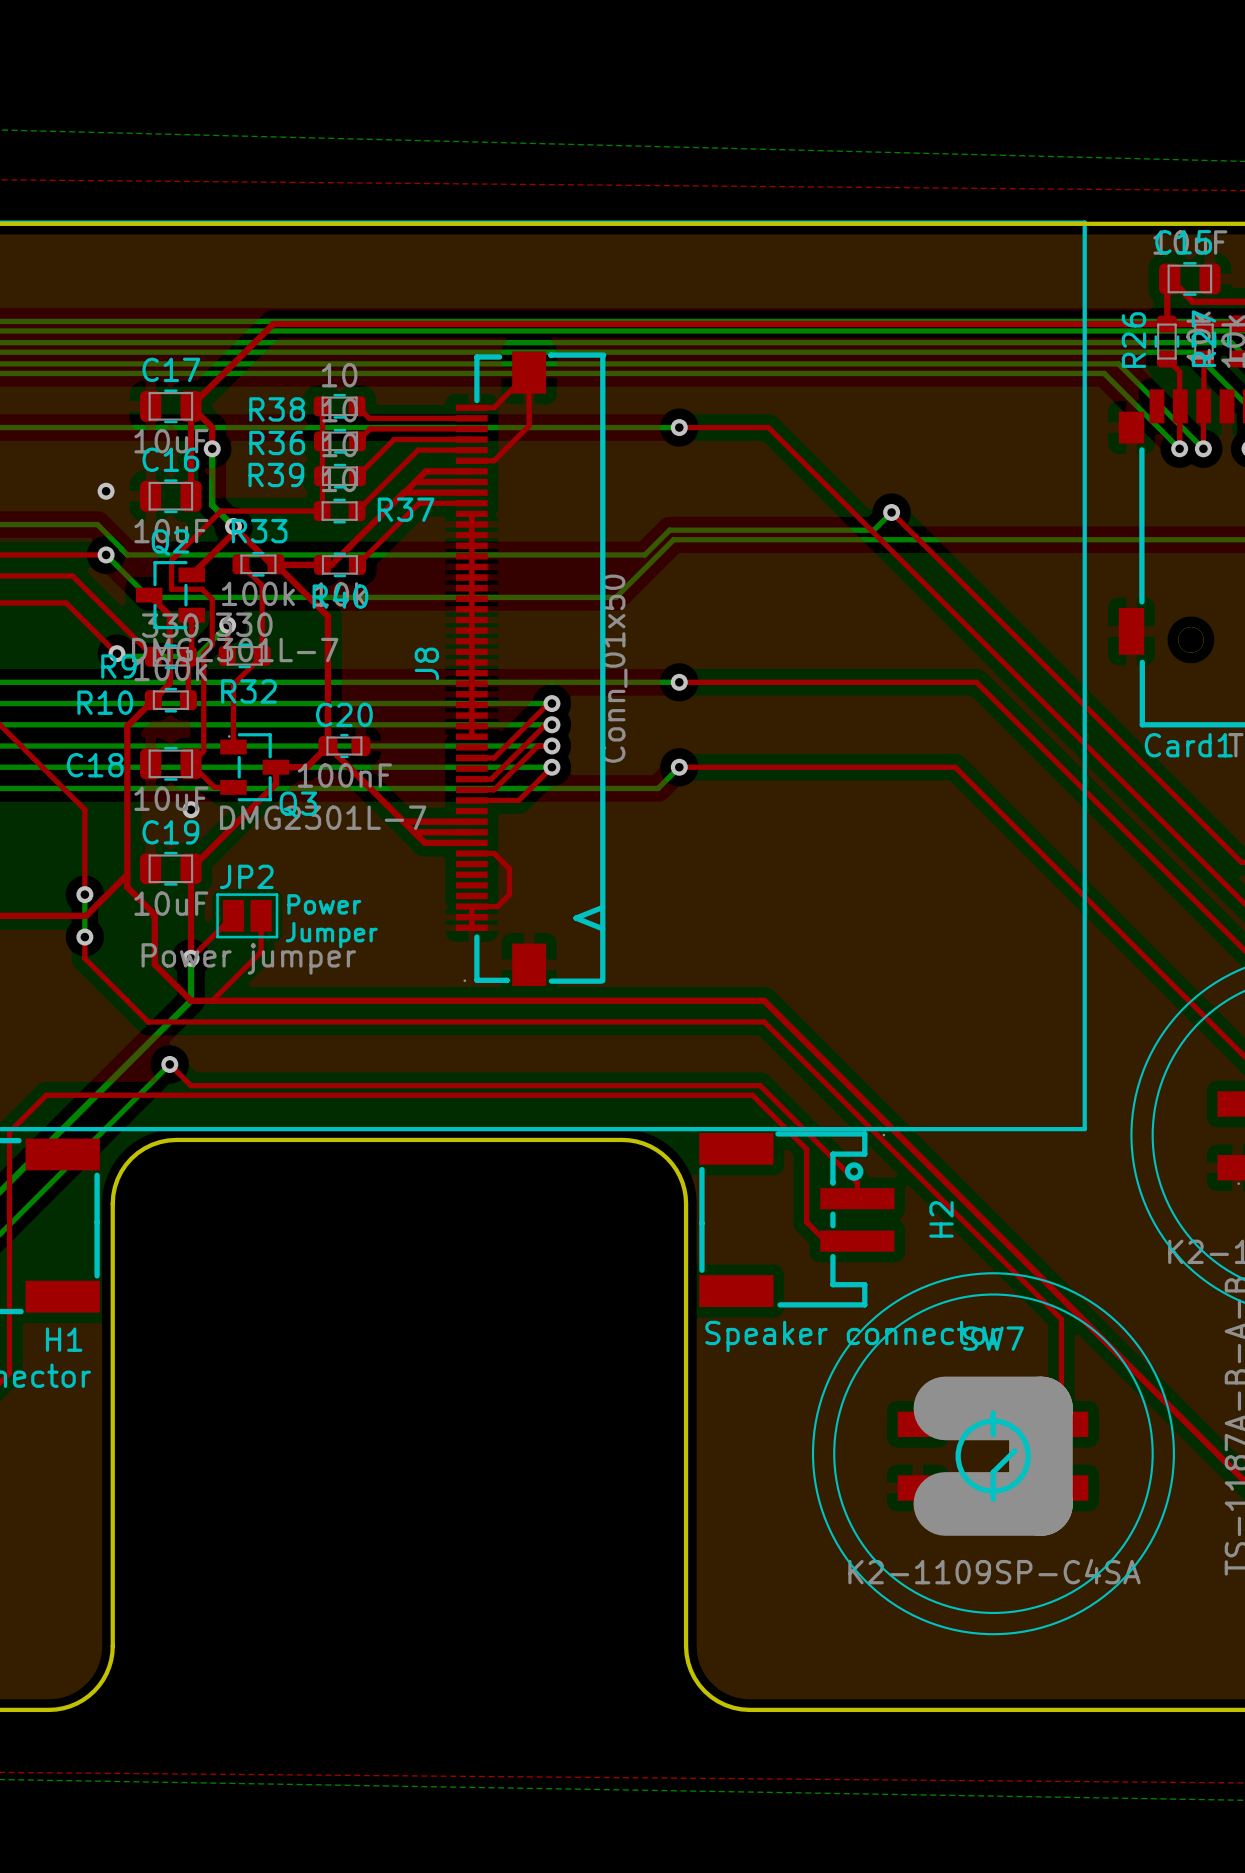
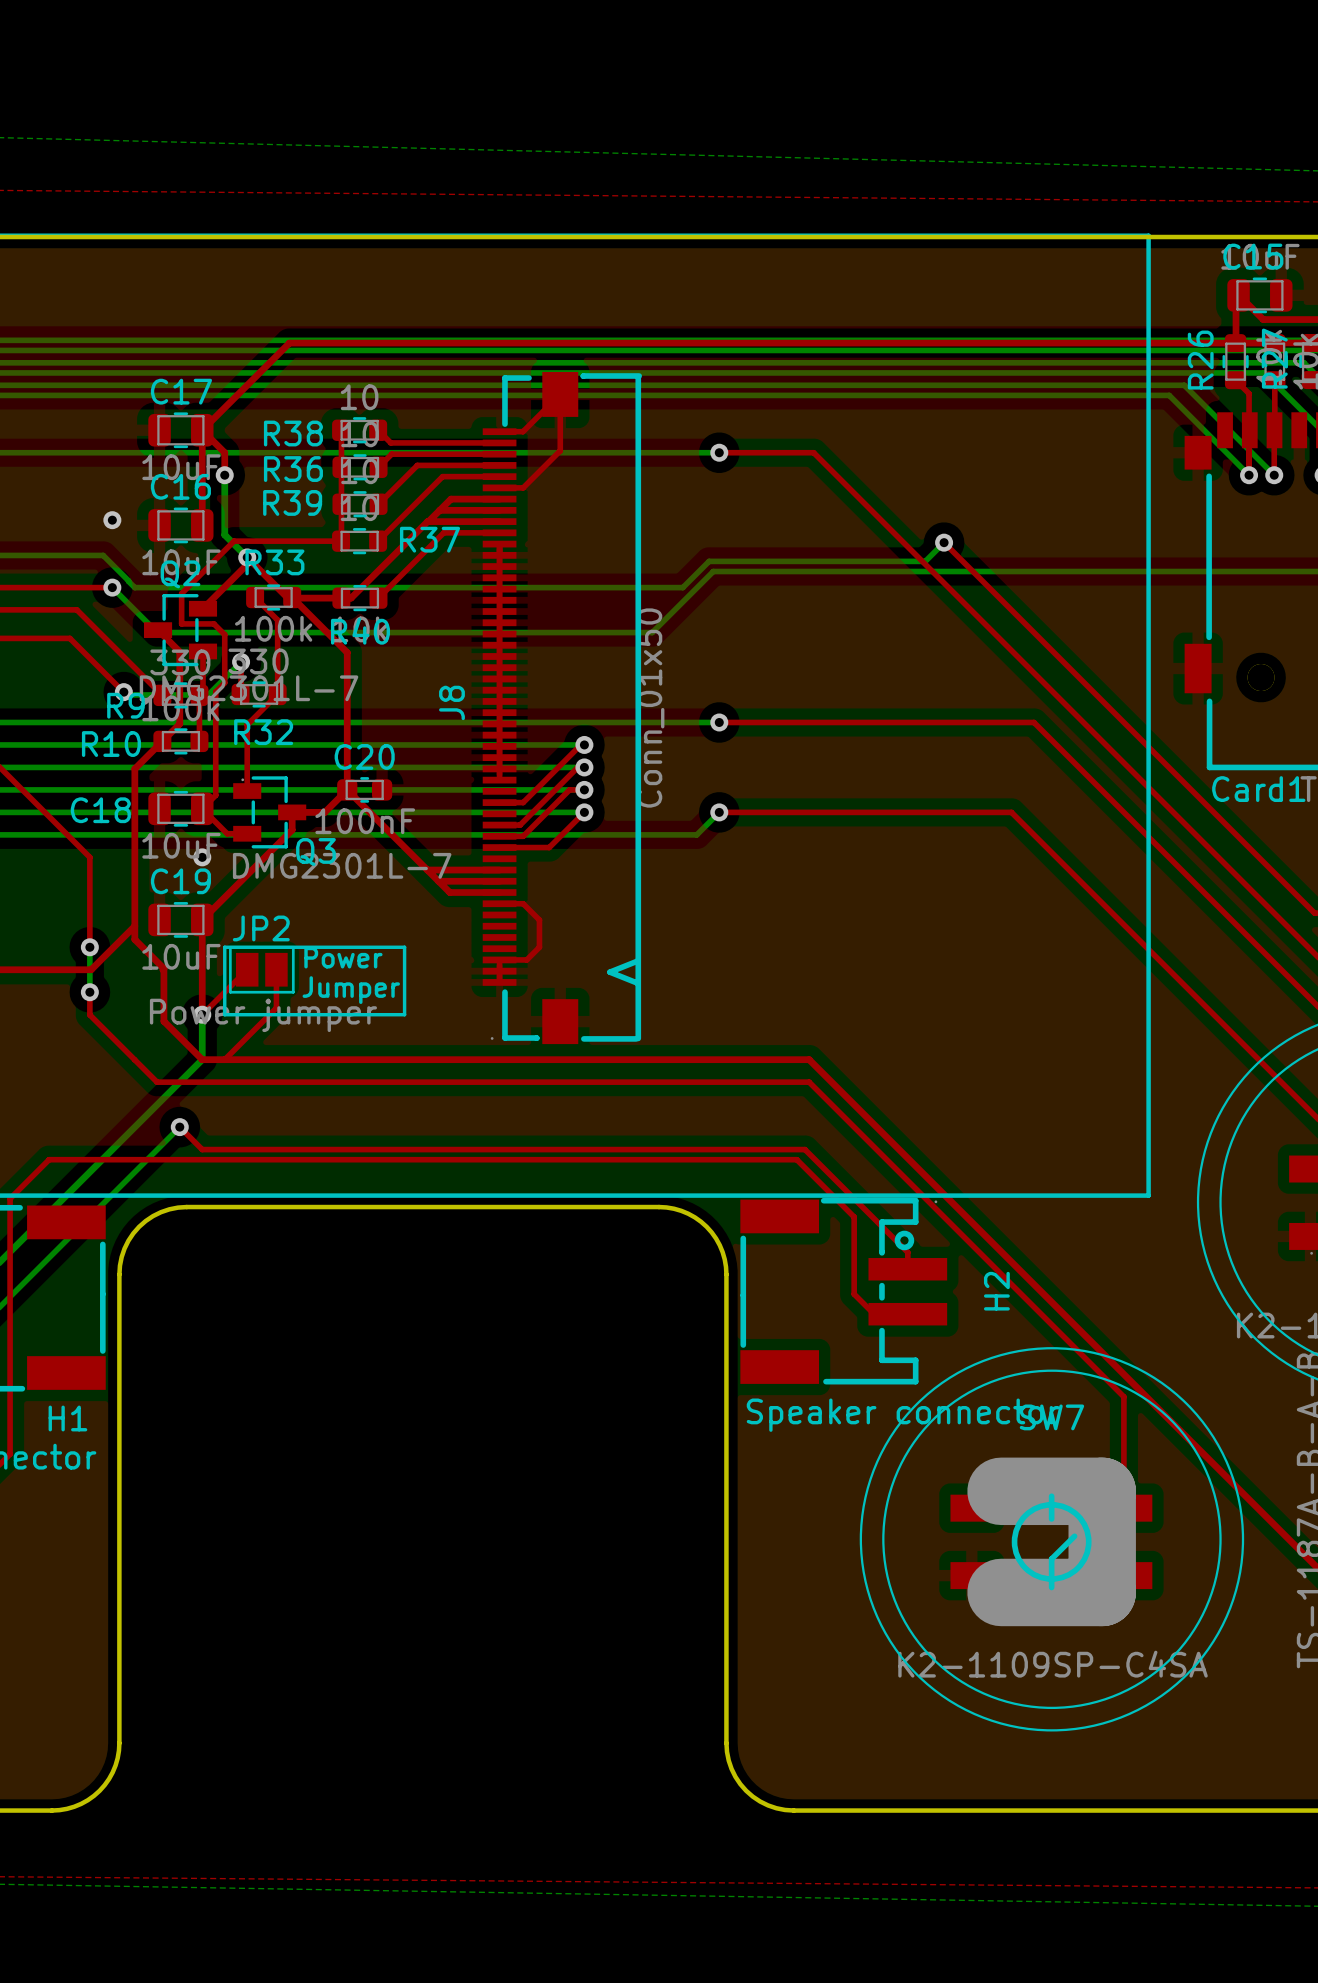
line: none -> (224, 947) (404, 947) (404, 1014) (224, 1014) (224, 947)

